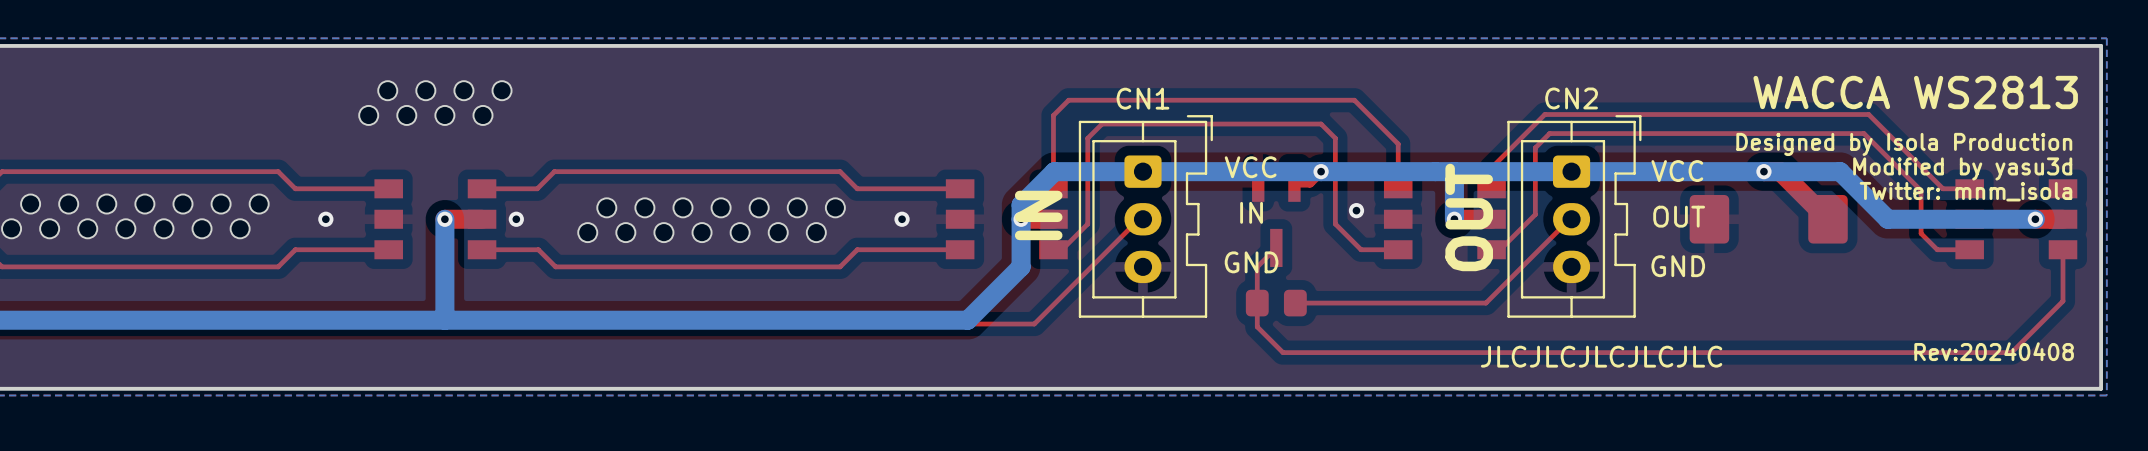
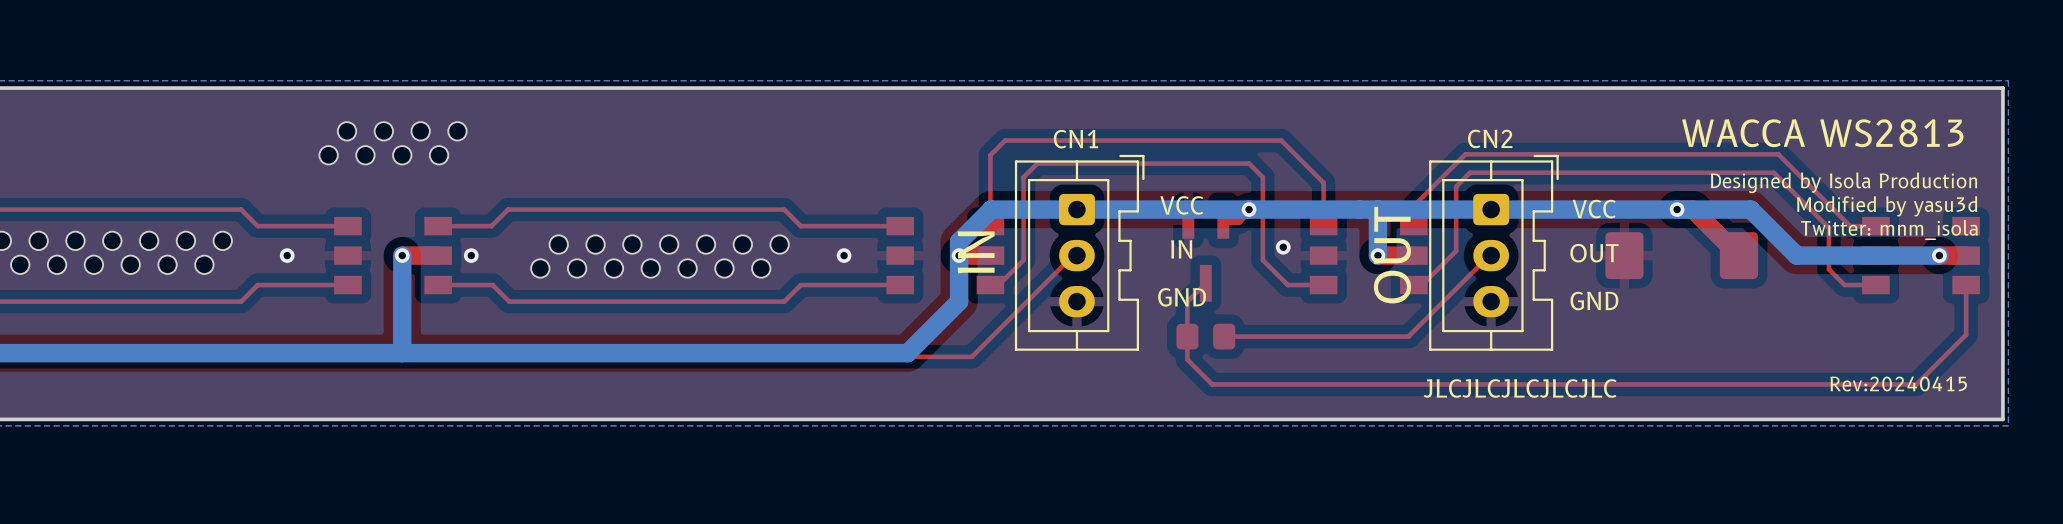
text: Rev:20240408 (1994, 351) -> Rev:20240415 (1898, 384)

